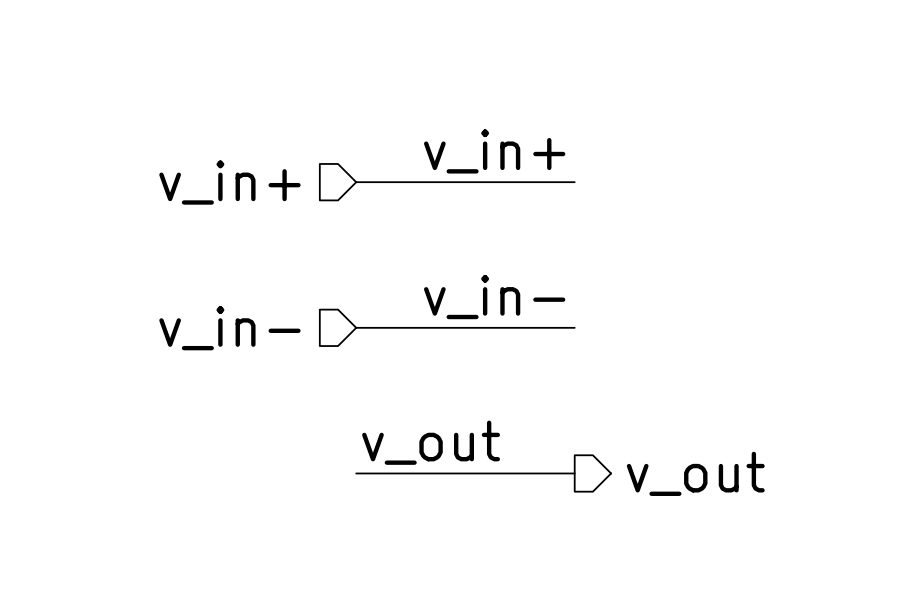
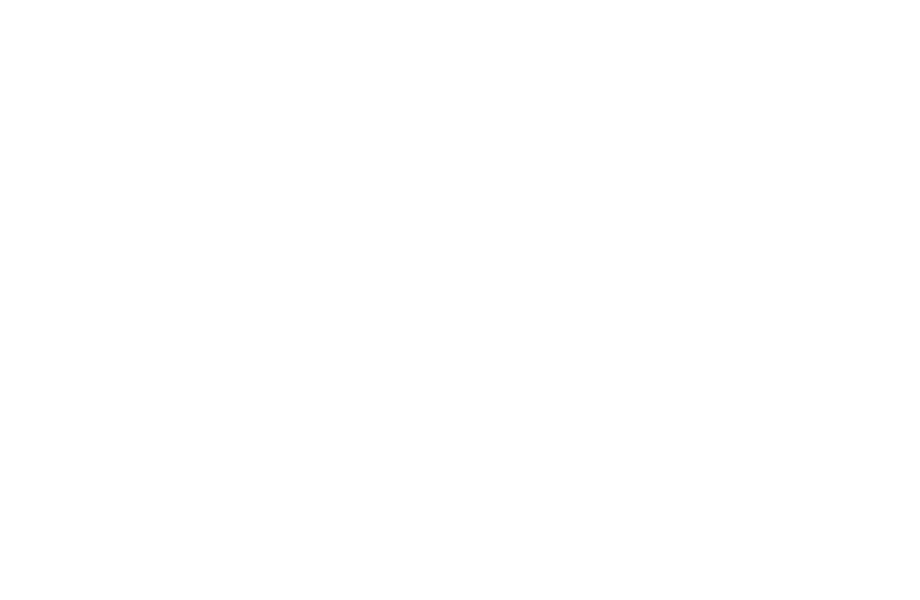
label: v_in+ (494, 151) -> none
hierarchical label: v_in+ (229, 182) -> none
wire: (356, 182) (574, 182) -> none
label: v_in- (494, 297) -> none
wire: (356, 327) (574, 327) -> none
hierarchical label: v_in- (229, 328) -> none
label: v_out (431, 442) -> none
wire: (356, 473) (574, 473) -> none
hierarchical label: v_out (695, 473) -> none

